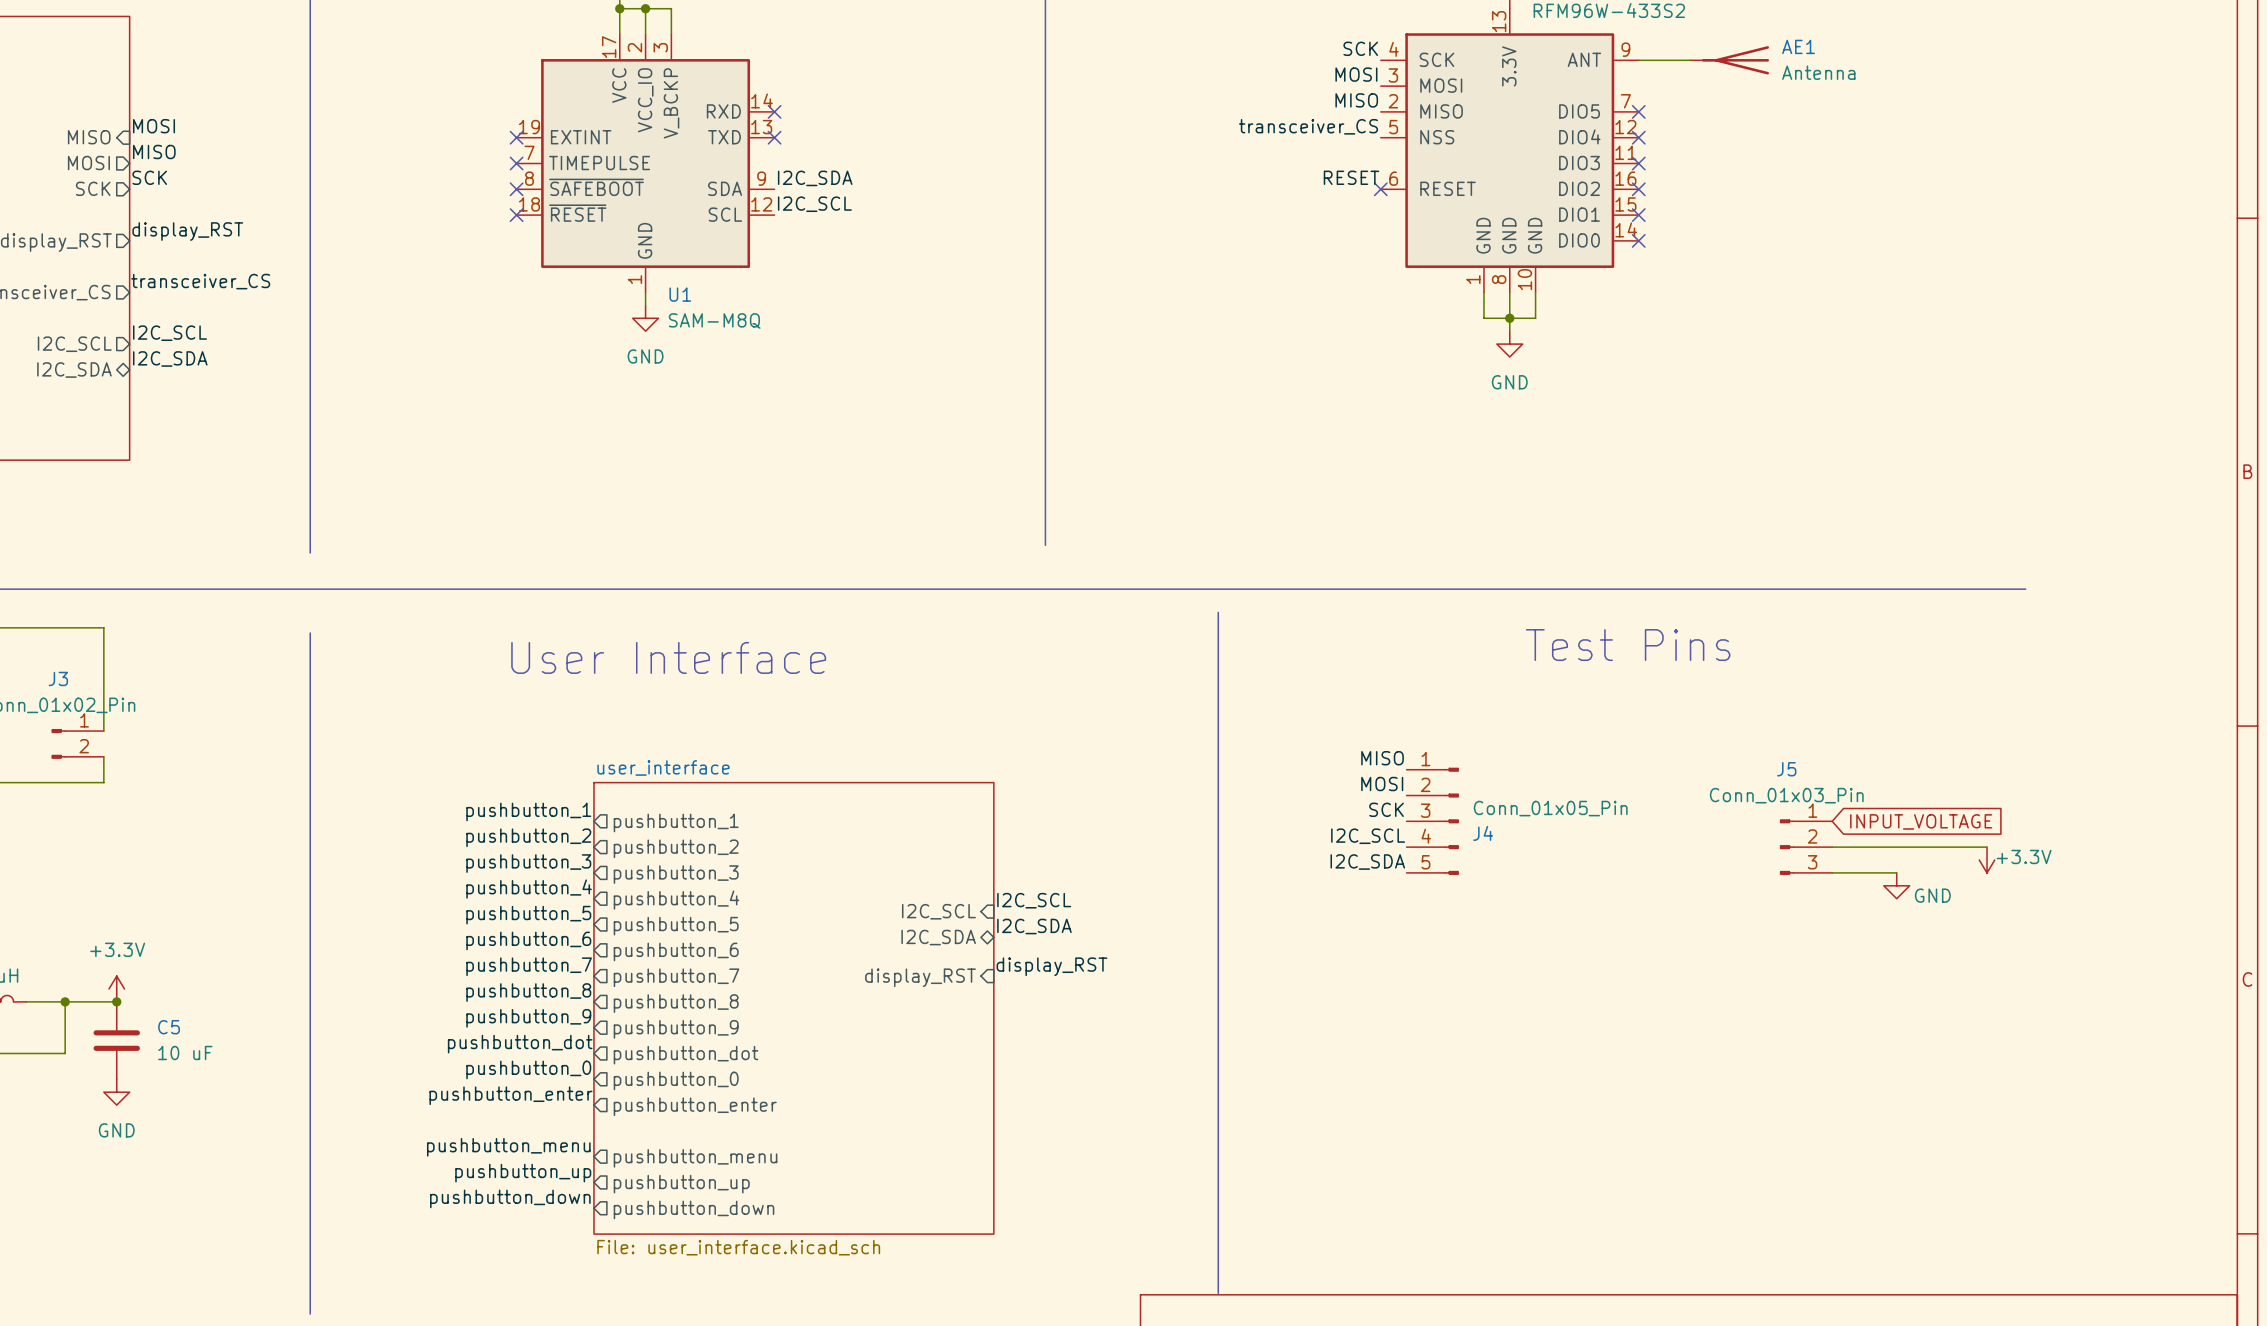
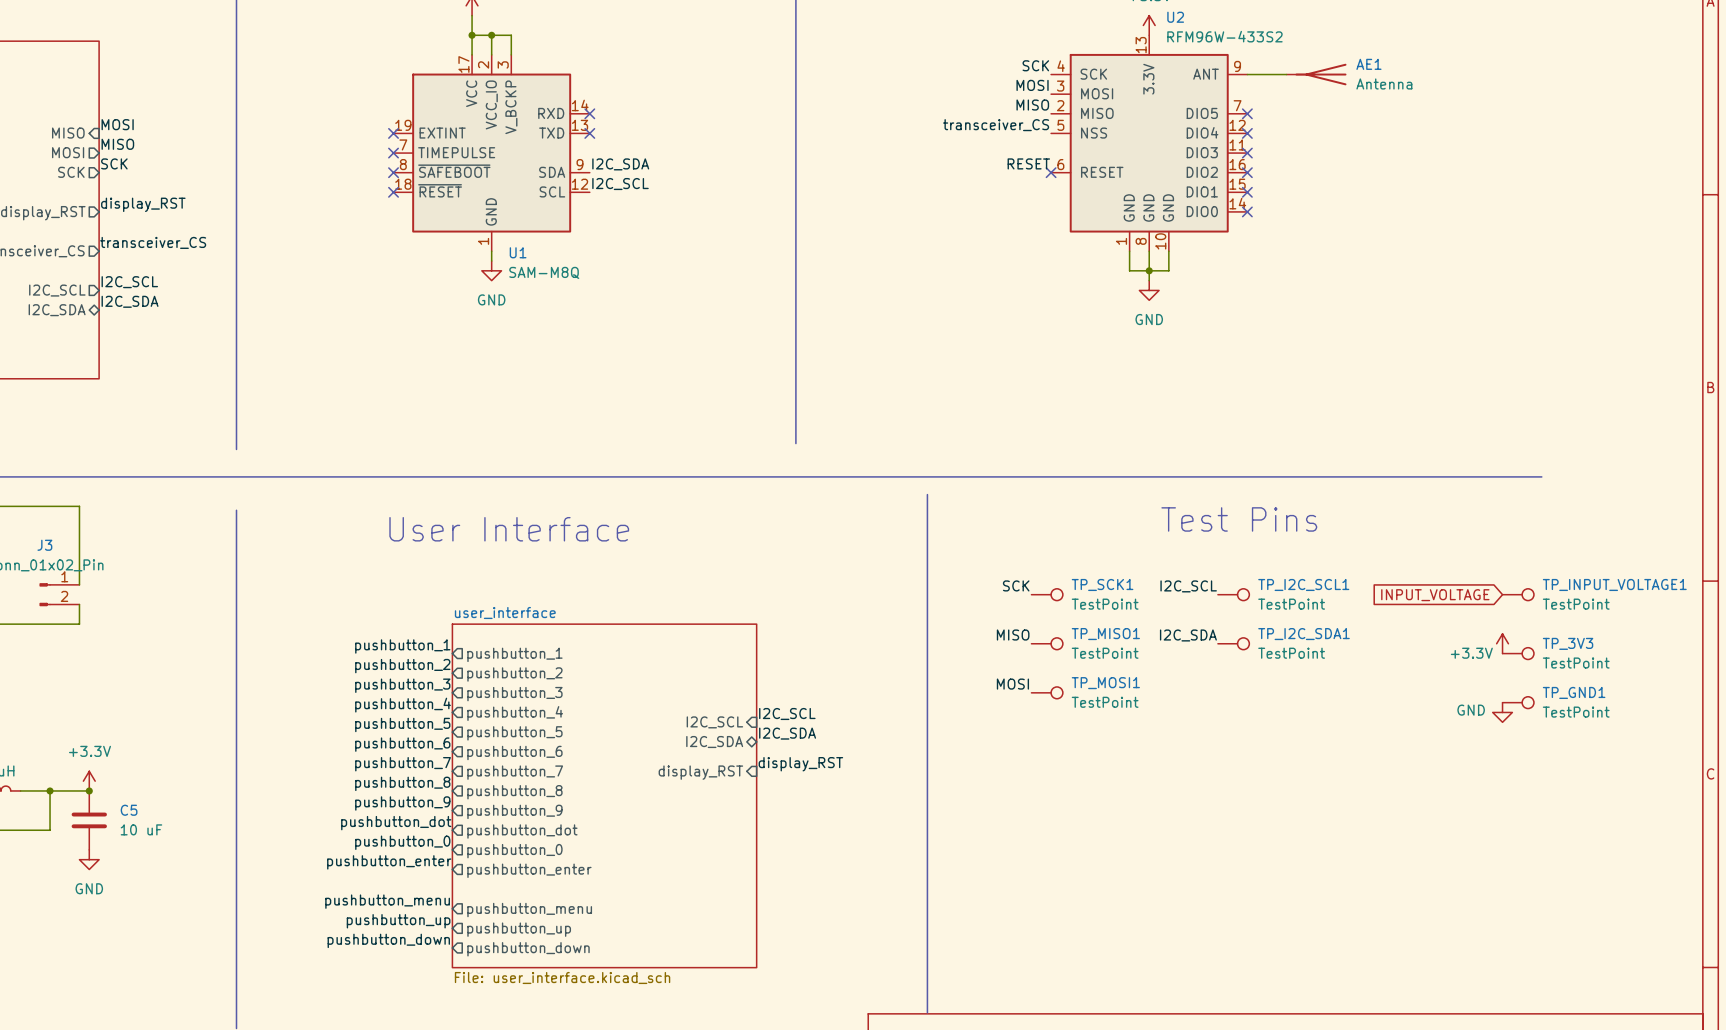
TP_SCK1: none -> TestPoint (1047, 594)
TP_I2C_SCL1: none -> TestPoint (1233, 594)
TP_INPUT_VOLTAGE1: none -> TestPoint (1518, 594)
label position: MISO (1382, 758) -> MISO (1013, 635)
label position: MOSI (1382, 784) -> MOSI (1012, 684)
TP_MISO1: none -> TestPoint (1047, 643)
TP_I2C_SDA1: none -> TestPoint (1233, 643)
label position: SCK (1386, 809) -> SCK (1016, 585)
J4: Conn_01x05_Pin (1432, 821) -> none
global label rotation: 0° (1921, 821) -> 180° (1435, 595)
TP_3V3: none -> TestPoint (1518, 653)
label position: I2C_SCL (1368, 836) -> I2C_SCL (1188, 586)
J5: Conn_01x03_Pin (1806, 847) -> none
wire: (1832, 847) (1987, 847) -> none
power symbol rotation: 0° (1987, 860) -> 180° (1502, 643)
power symbol position: +3.3V (1987, 860) -> +3.3V (1502, 643)
label position: I2C_SDA (1367, 862) -> I2C_SDA (1188, 635)
TP_MOSI1: none -> TestPoint (1047, 692)
wire: (1832, 872) (1896, 872) -> none
power symbol position: GND (1896, 885) -> GND (1502, 712)
TP_GND1: none -> TestPoint (1518, 702)

